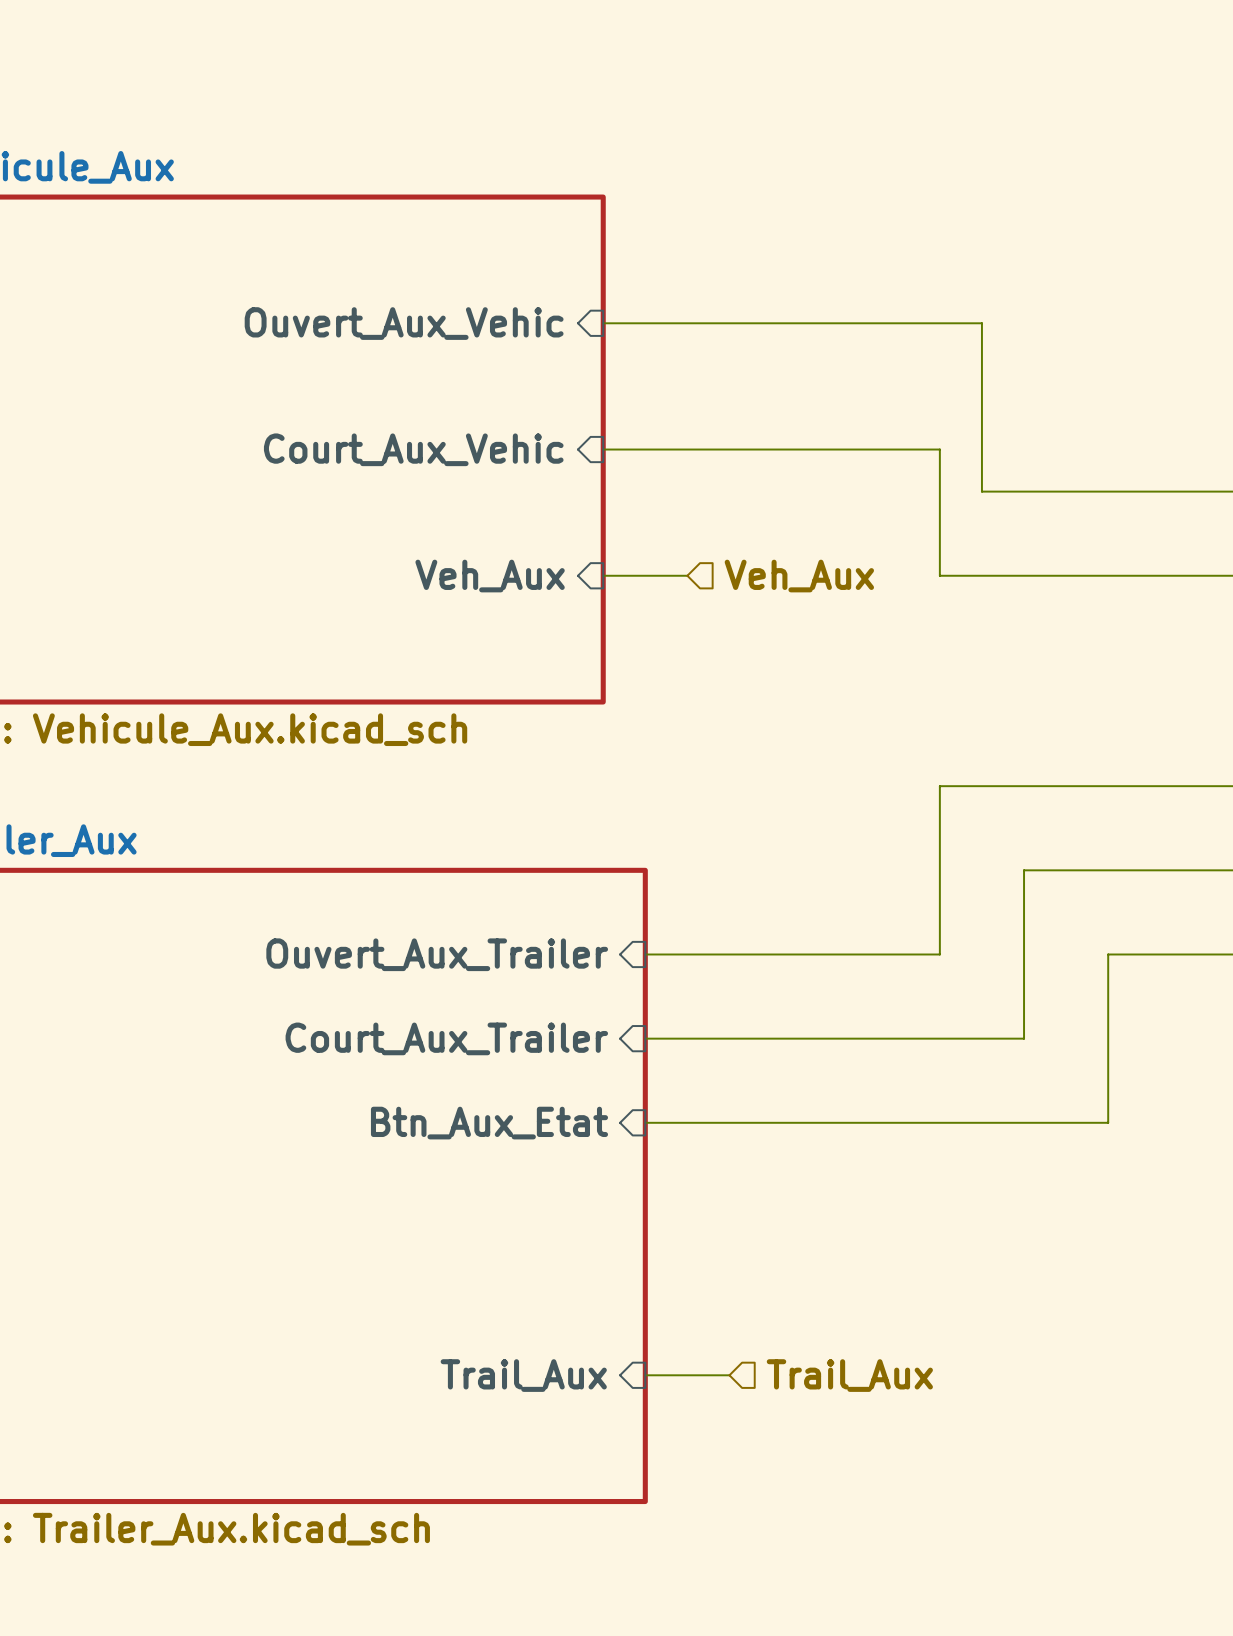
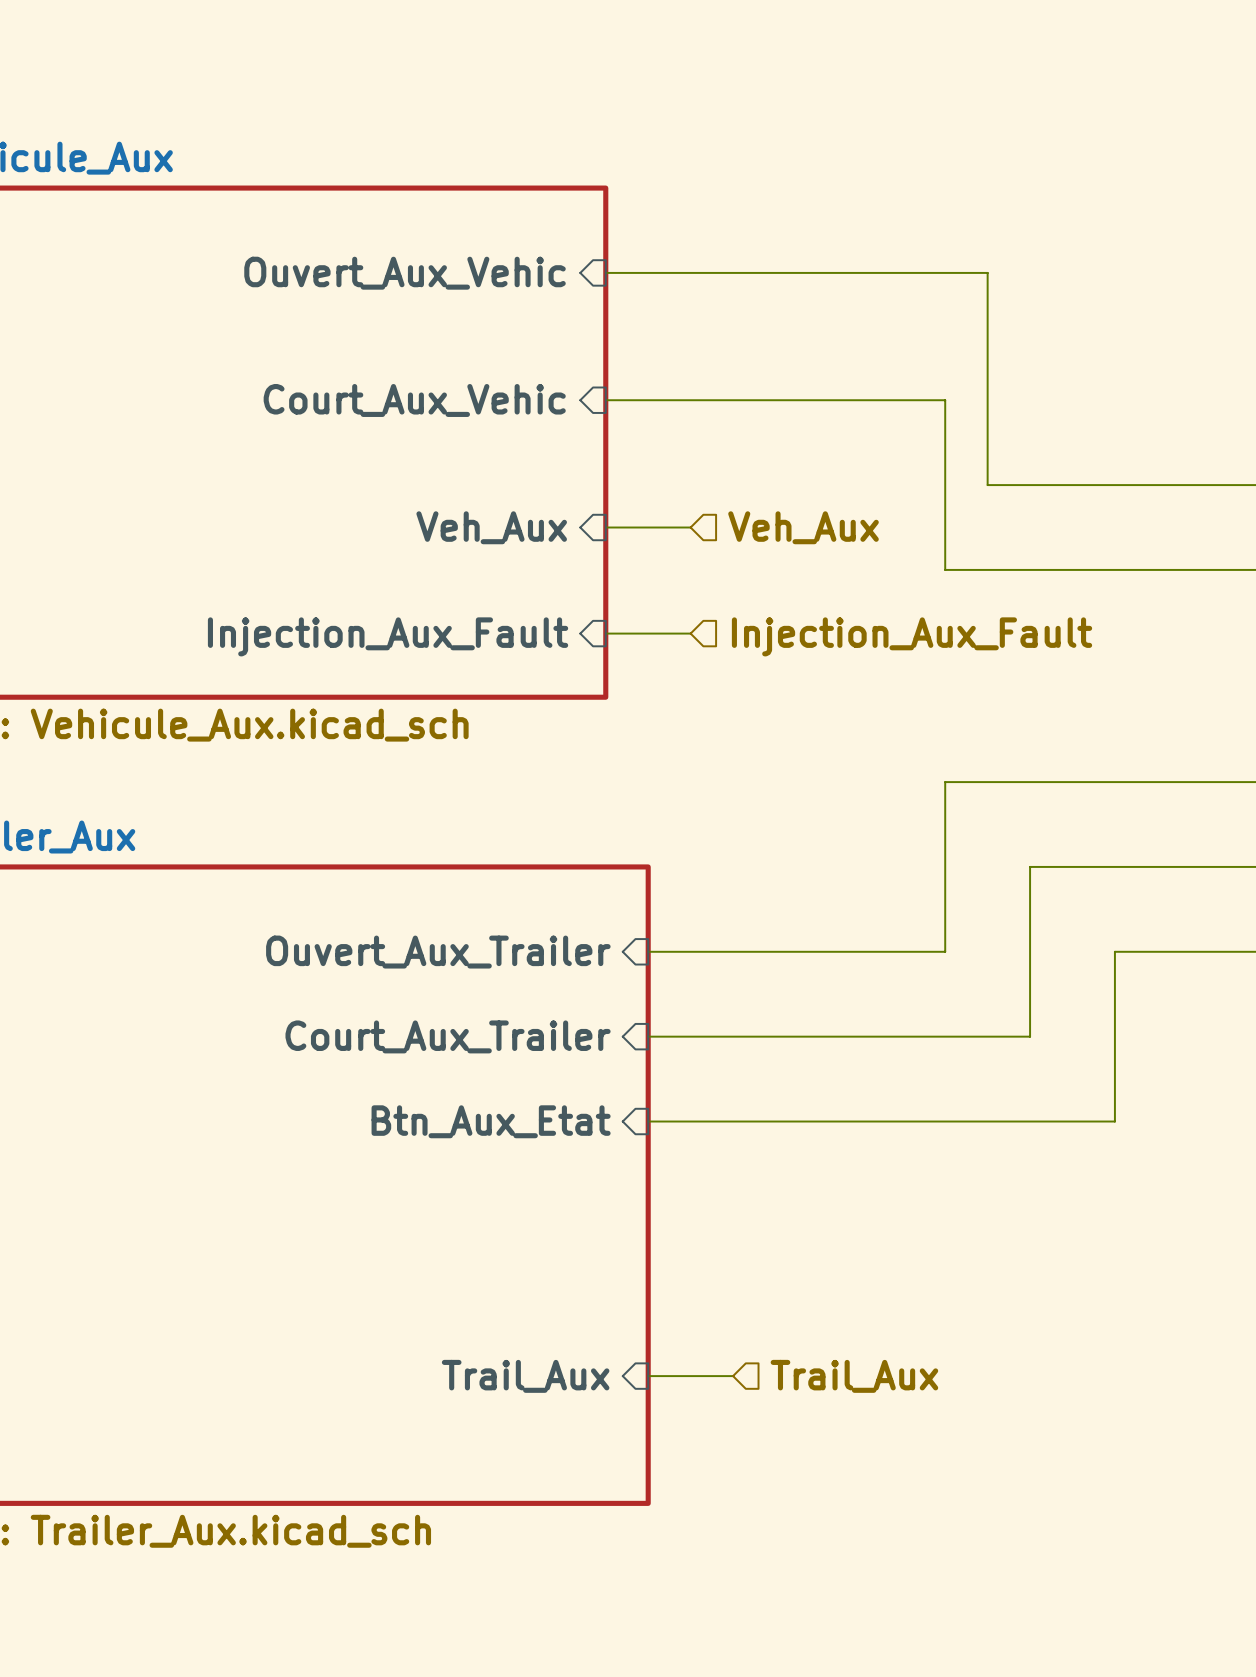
sheet pin position: Ouvert_Aux_Vehic (404, 323) -> Ouvert_Aux_Vehic (405, 273)
wire: (603, 323) (981, 323) -> (605, 272) (987, 272) (987, 315)
sheet pin position: Court_Aux_Vehic (413, 449) -> Court_Aux_Vehic (414, 400)
wire: (603, 449) (939, 449) -> (605, 400) (945, 400) (945, 442)
wire: (603, 575) (687, 575) -> (605, 527) (690, 527)
sheet pin position: Veh_Aux (490, 576) -> Veh_Aux (491, 527)
hierarchical label position: Veh_Aux (799, 576) -> Veh_Aux (803, 527)
wire: none -> (605, 633) (690, 633)
sheet pin: none -> Injection_Aux_Fault (388, 636)
hierarchical label: none -> Injection_Aux_Fault (912, 636)

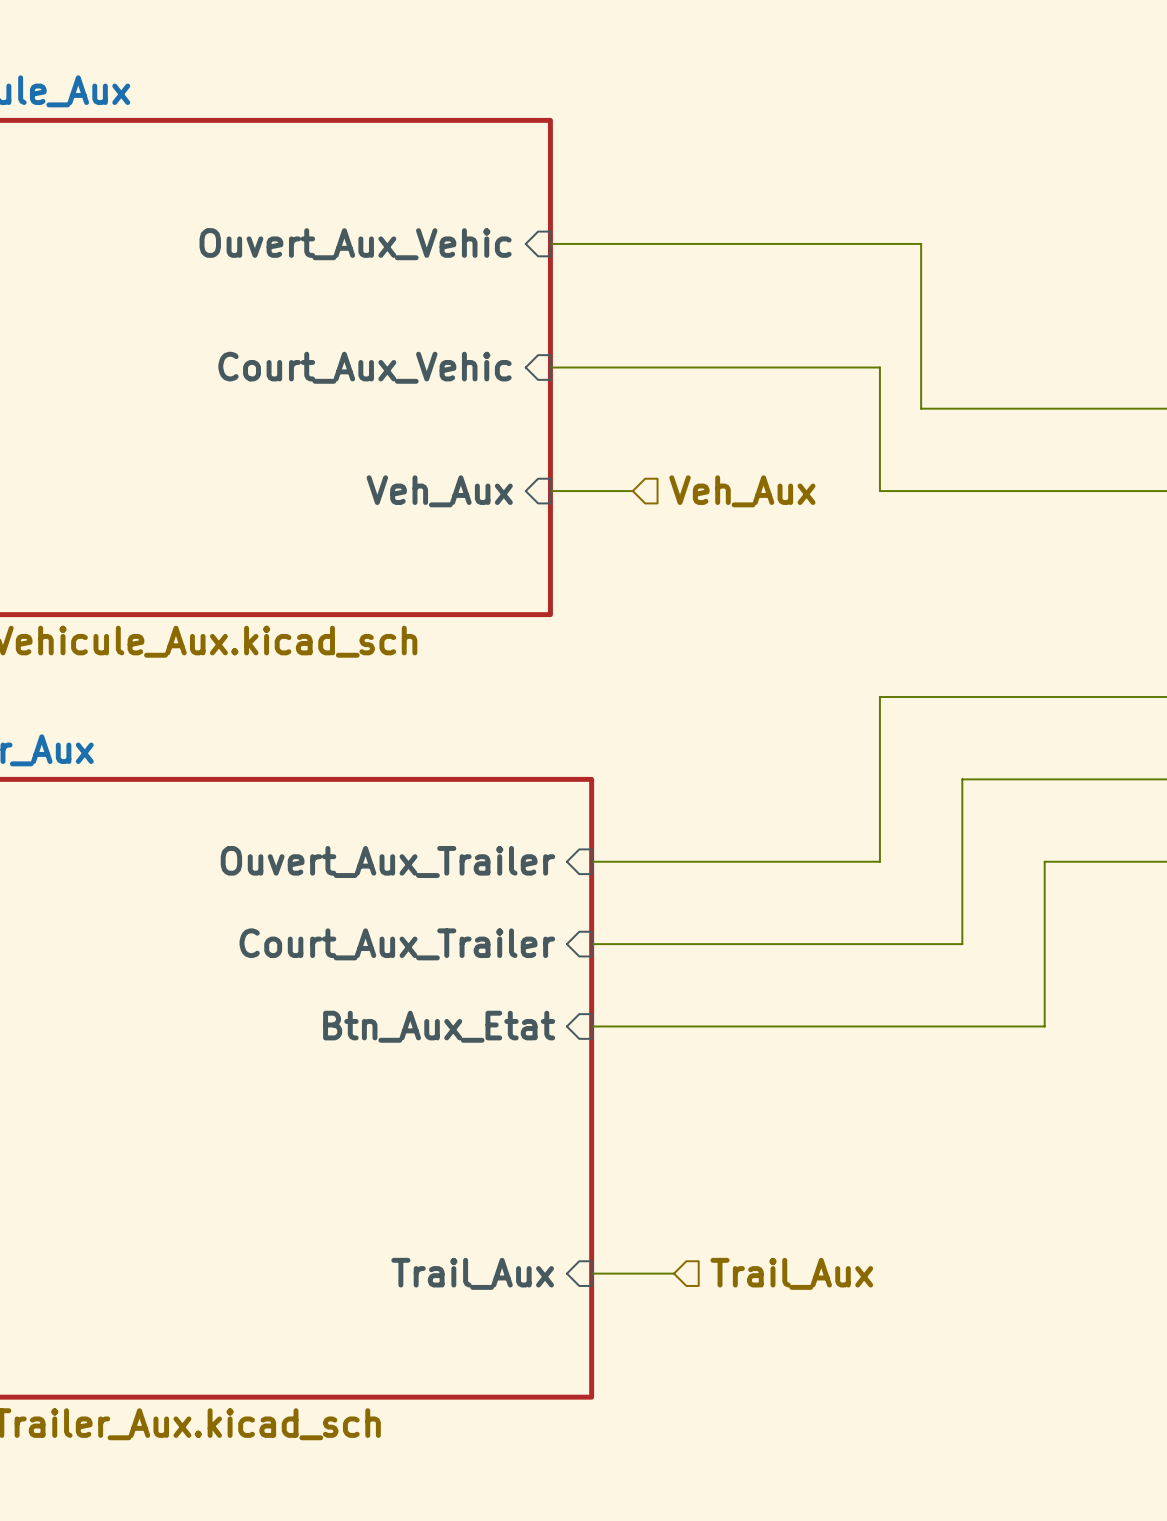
wire: (605, 272) (987, 272) (987, 315) -> (550, 243) (921, 243)
sheet pin position: Ouvert_Aux_Vehic (405, 273) -> Ouvert_Aux_Vehic (355, 244)
sheet pin position: Court_Aux_Vehic (414, 400) -> Court_Aux_Vehic (364, 367)
wire: (605, 400) (945, 400) (945, 442) -> (550, 367) (879, 367)
sheet pin position: Veh_Aux (491, 527) -> Veh_Aux (439, 491)
wire: (605, 527) (690, 527) -> (550, 491) (632, 491)
hierarchical label position: Veh_Aux (803, 527) -> Veh_Aux (742, 491)
wire: (605, 633) (690, 633) -> none
sheet pin: Injection_Aux_Fault (388, 636) -> none
hierarchical label: Injection_Aux_Fault (912, 636) -> none

